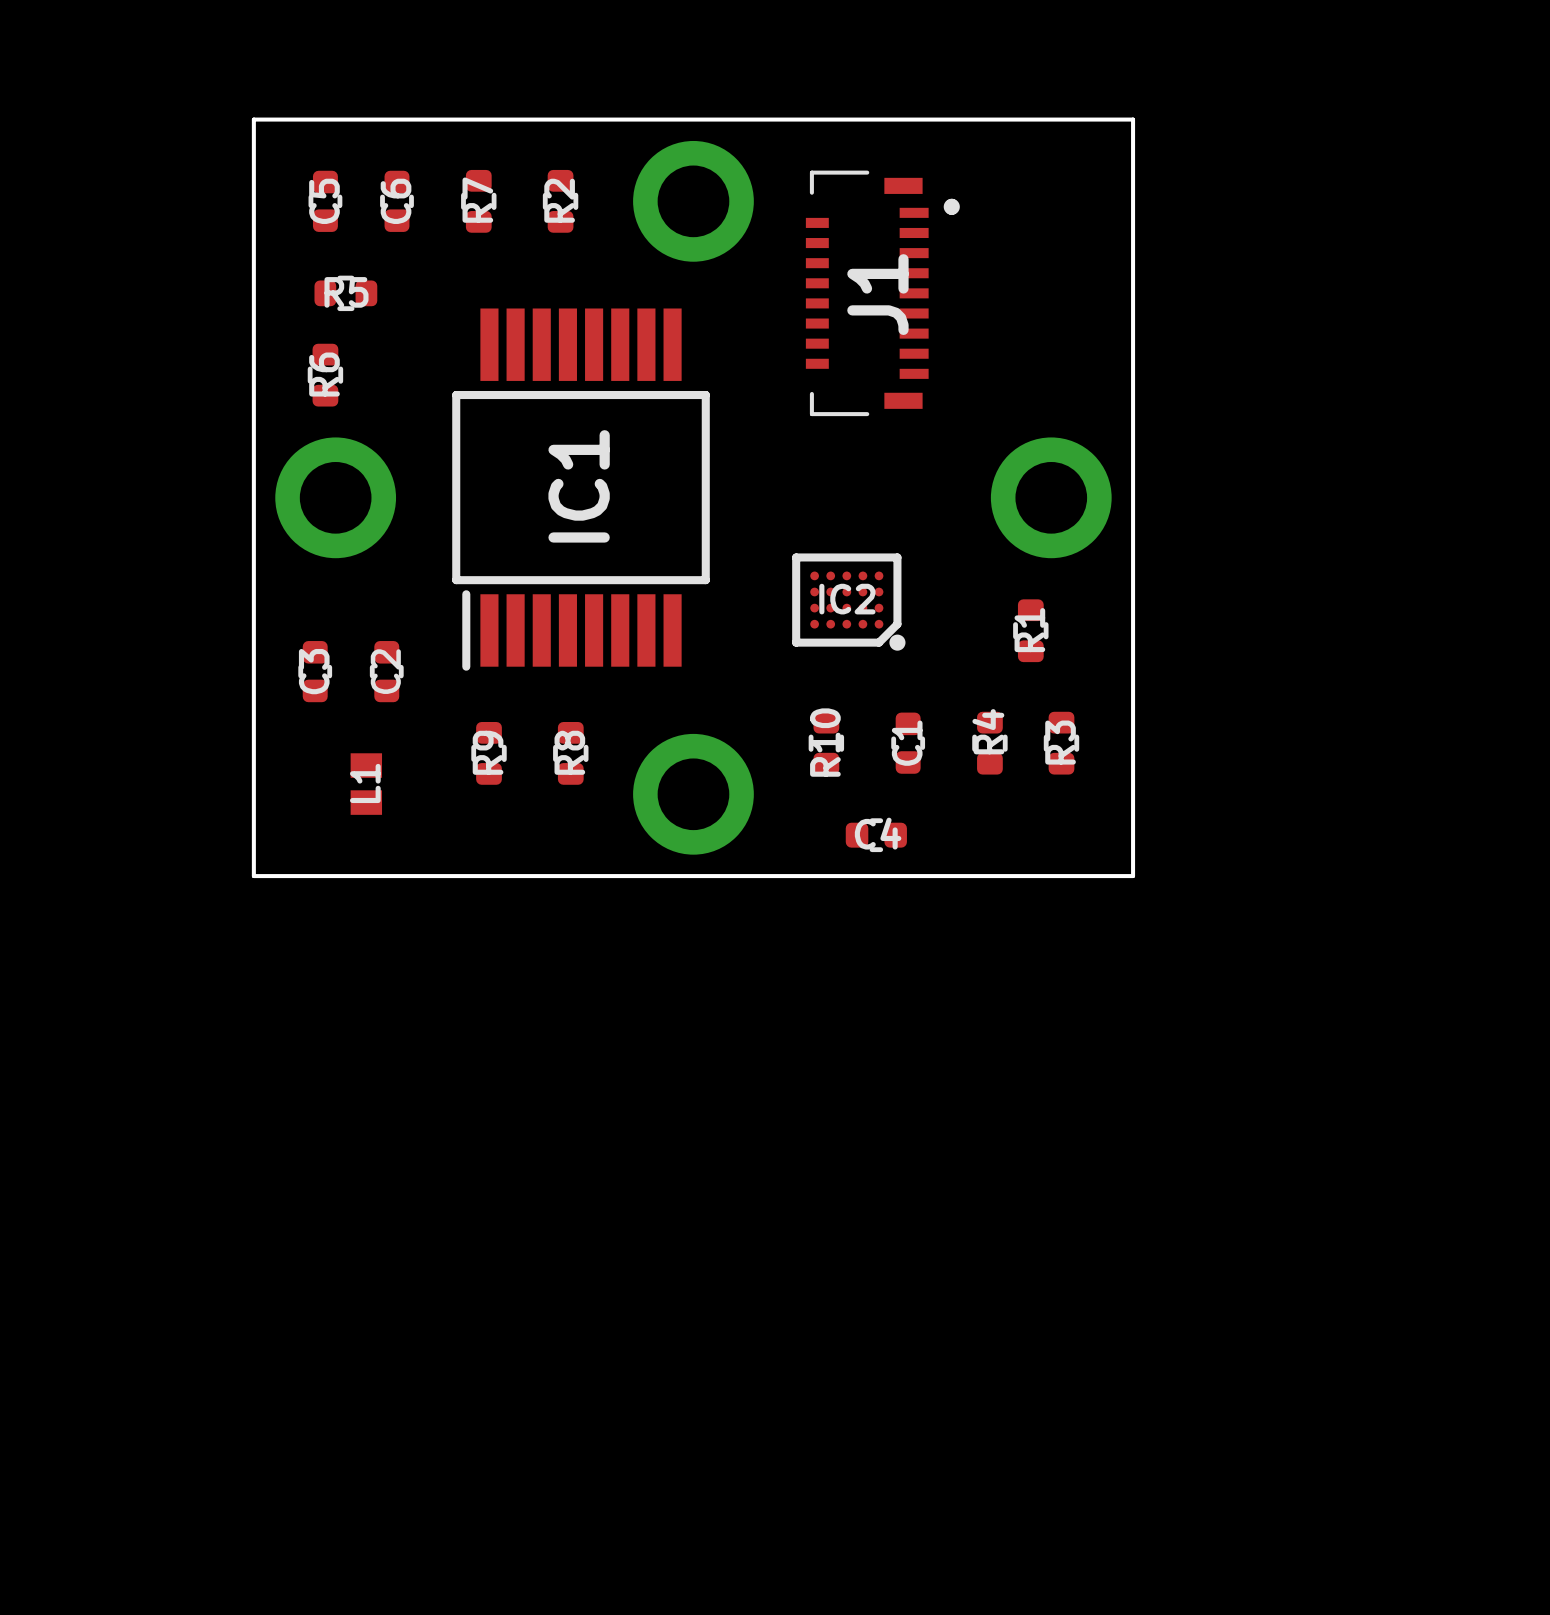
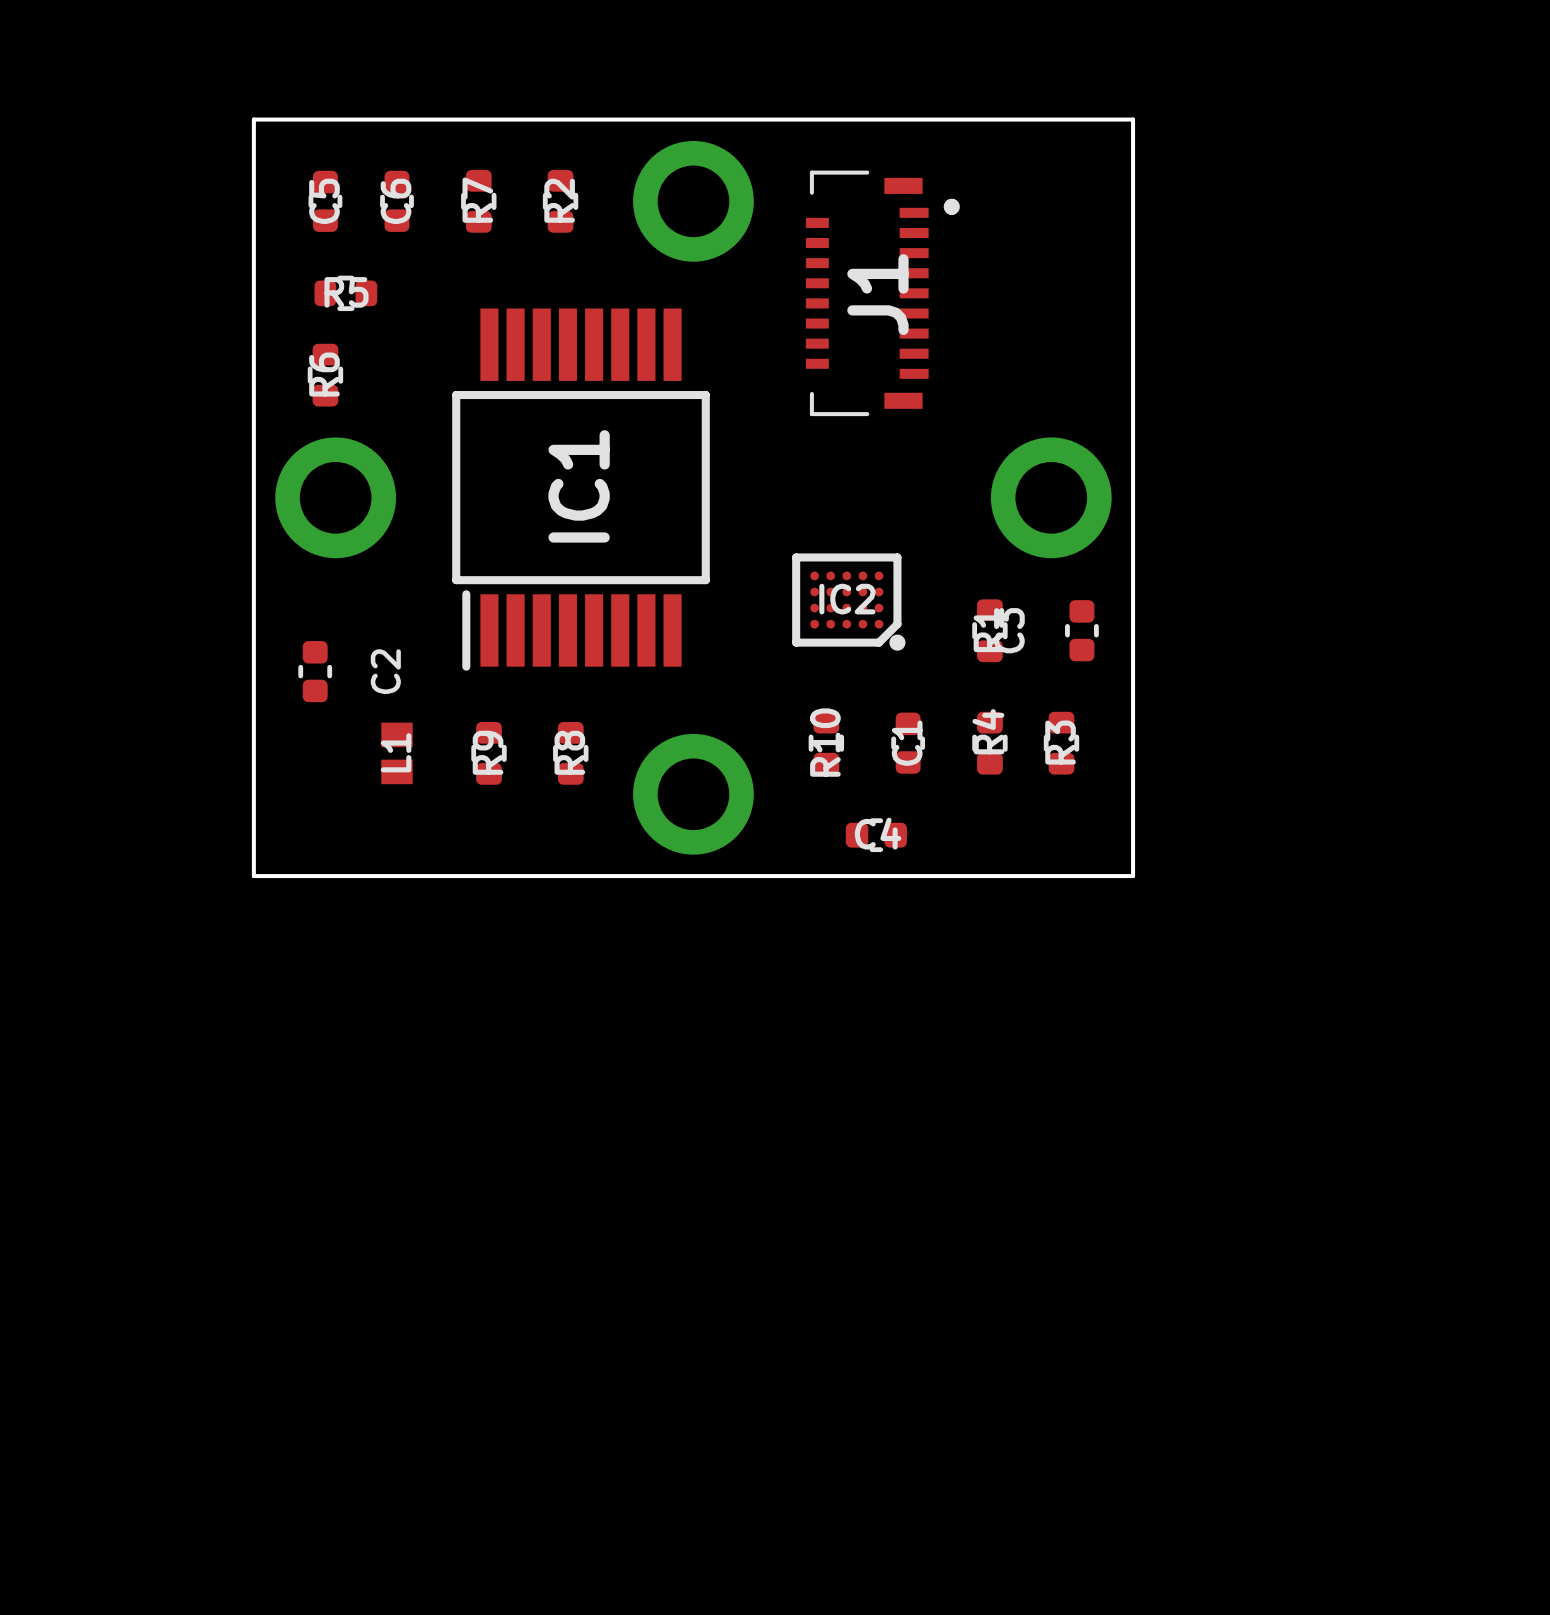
R1 position: (1030, 630) -> (989, 630)
C3 position: (386, 671) -> (1081, 630)
L1 position: (366, 784) -> (396, 753)

